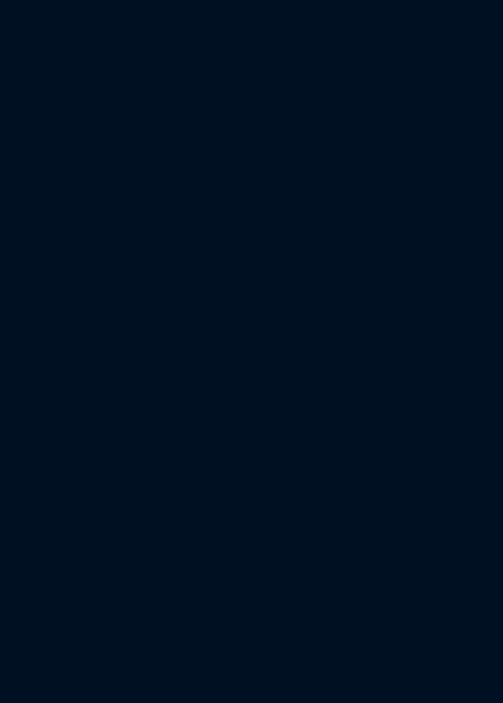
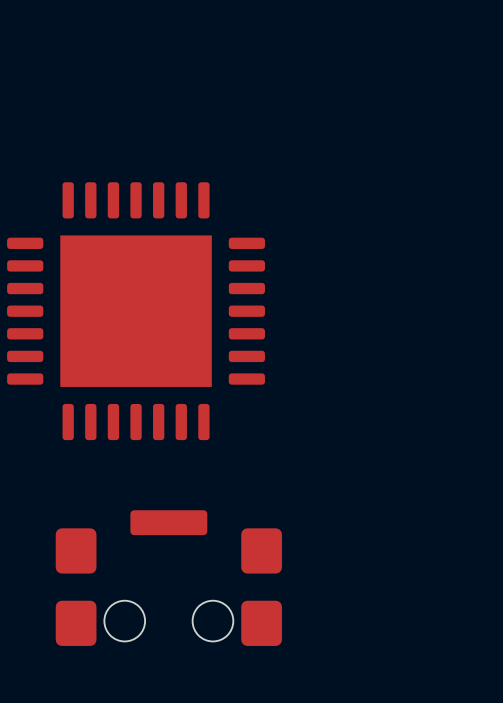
part: none -> (136, 311)
part: none -> (168, 578)

